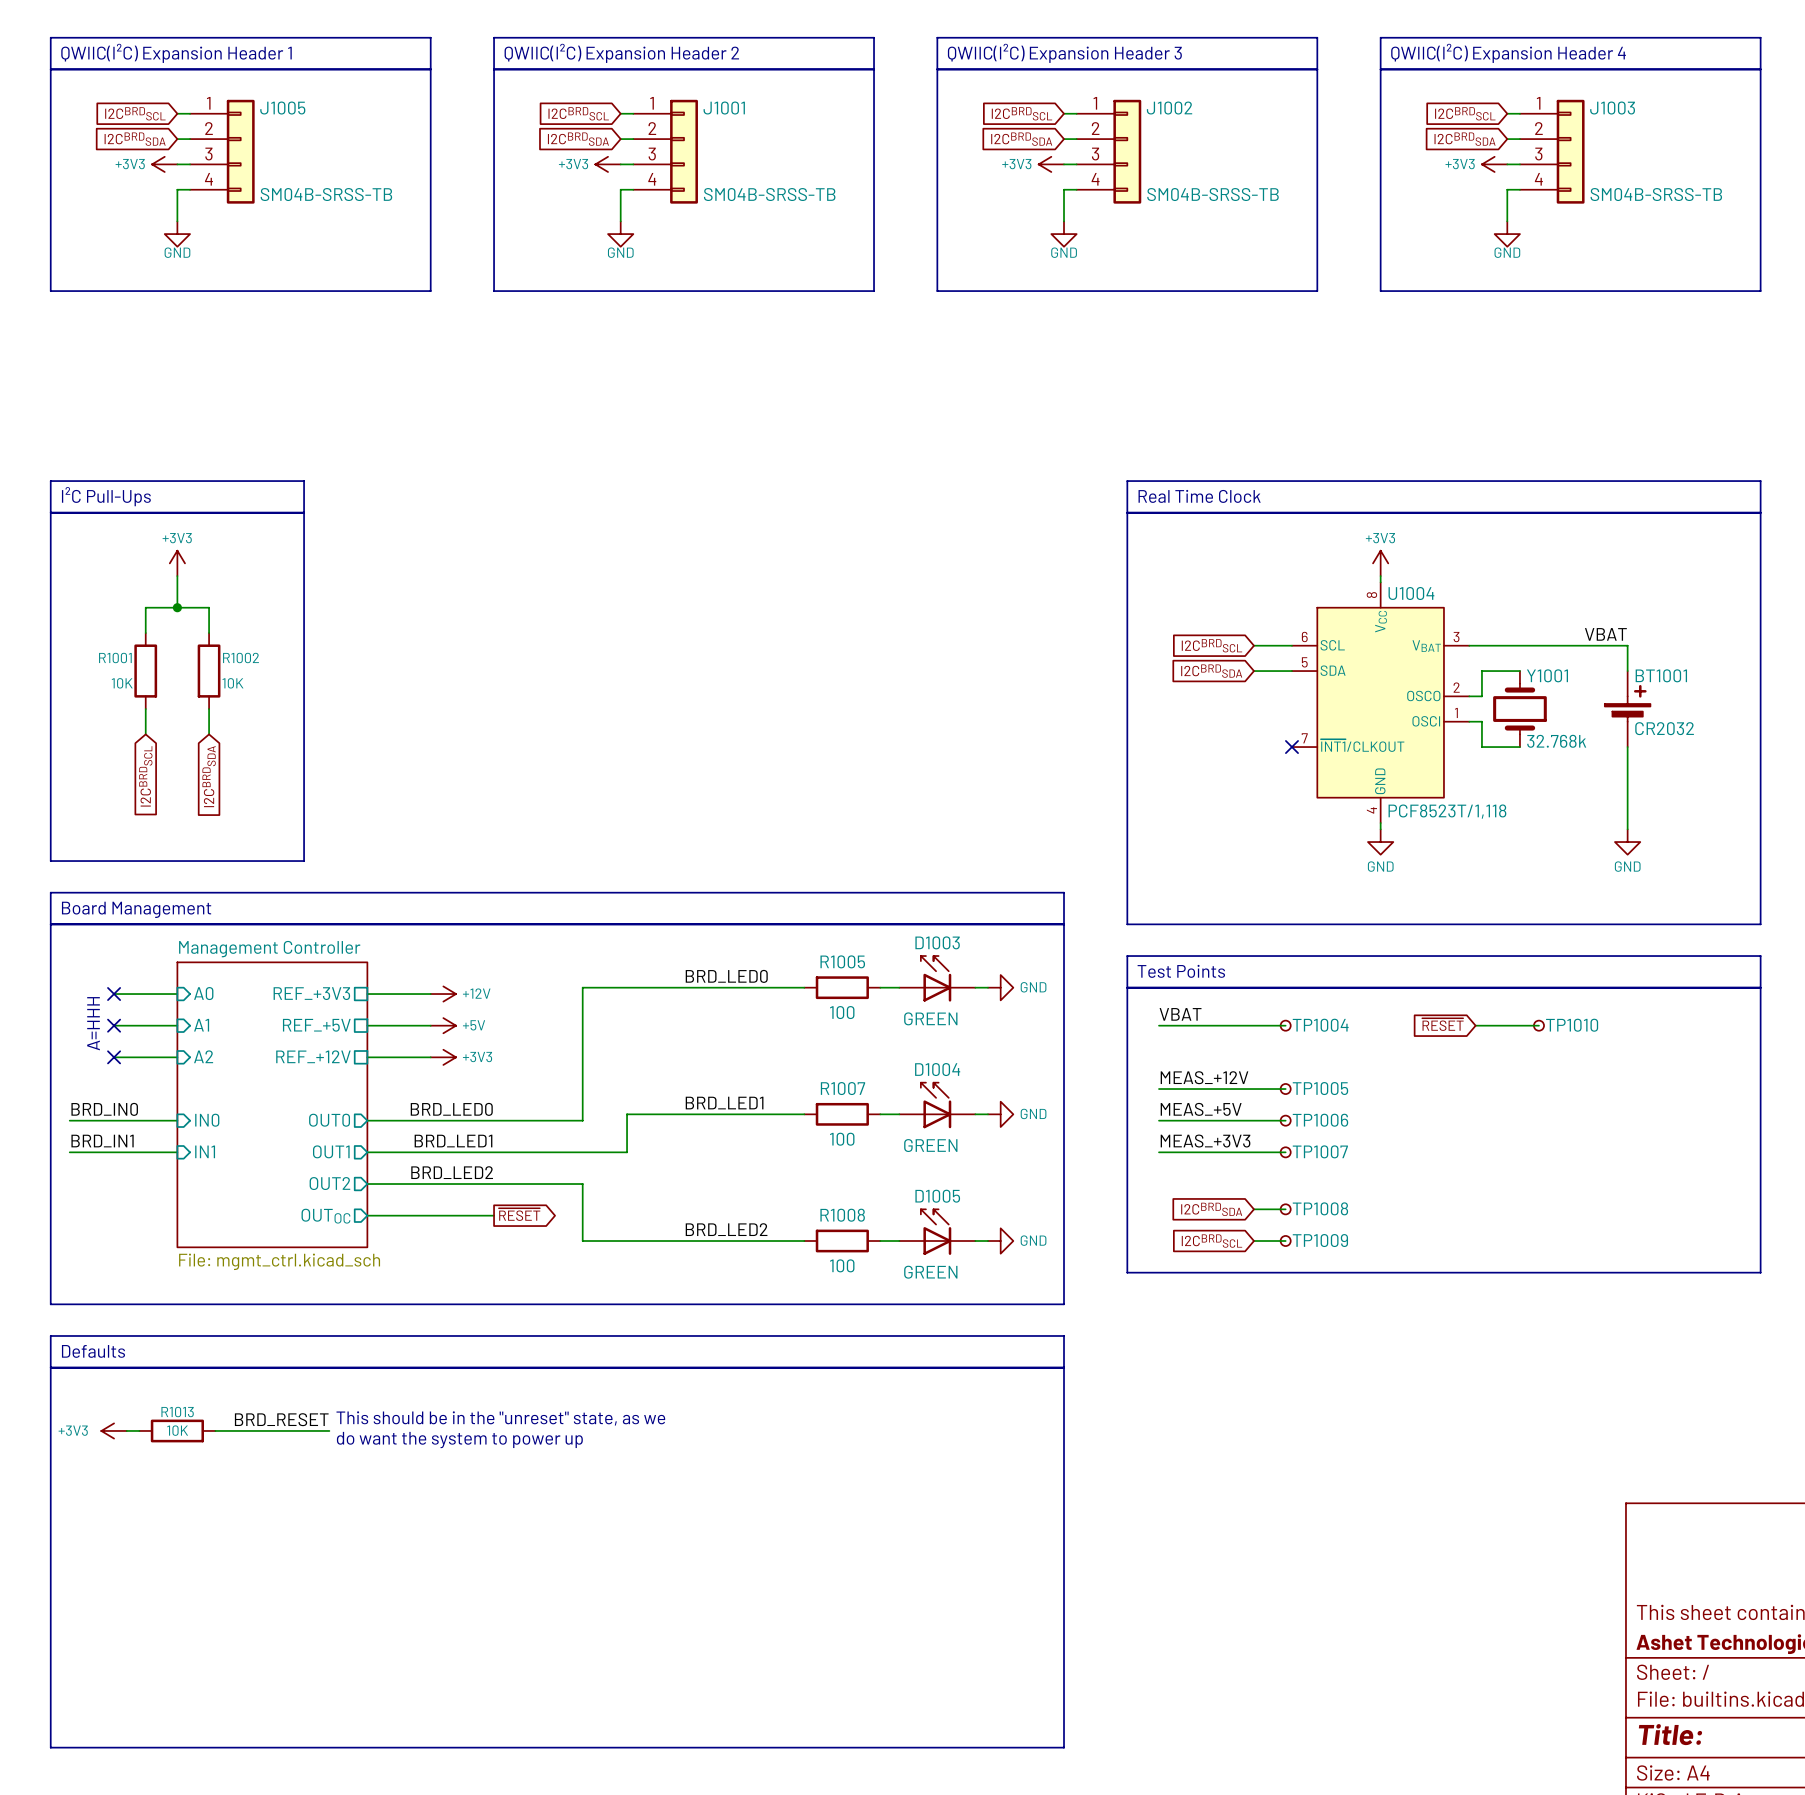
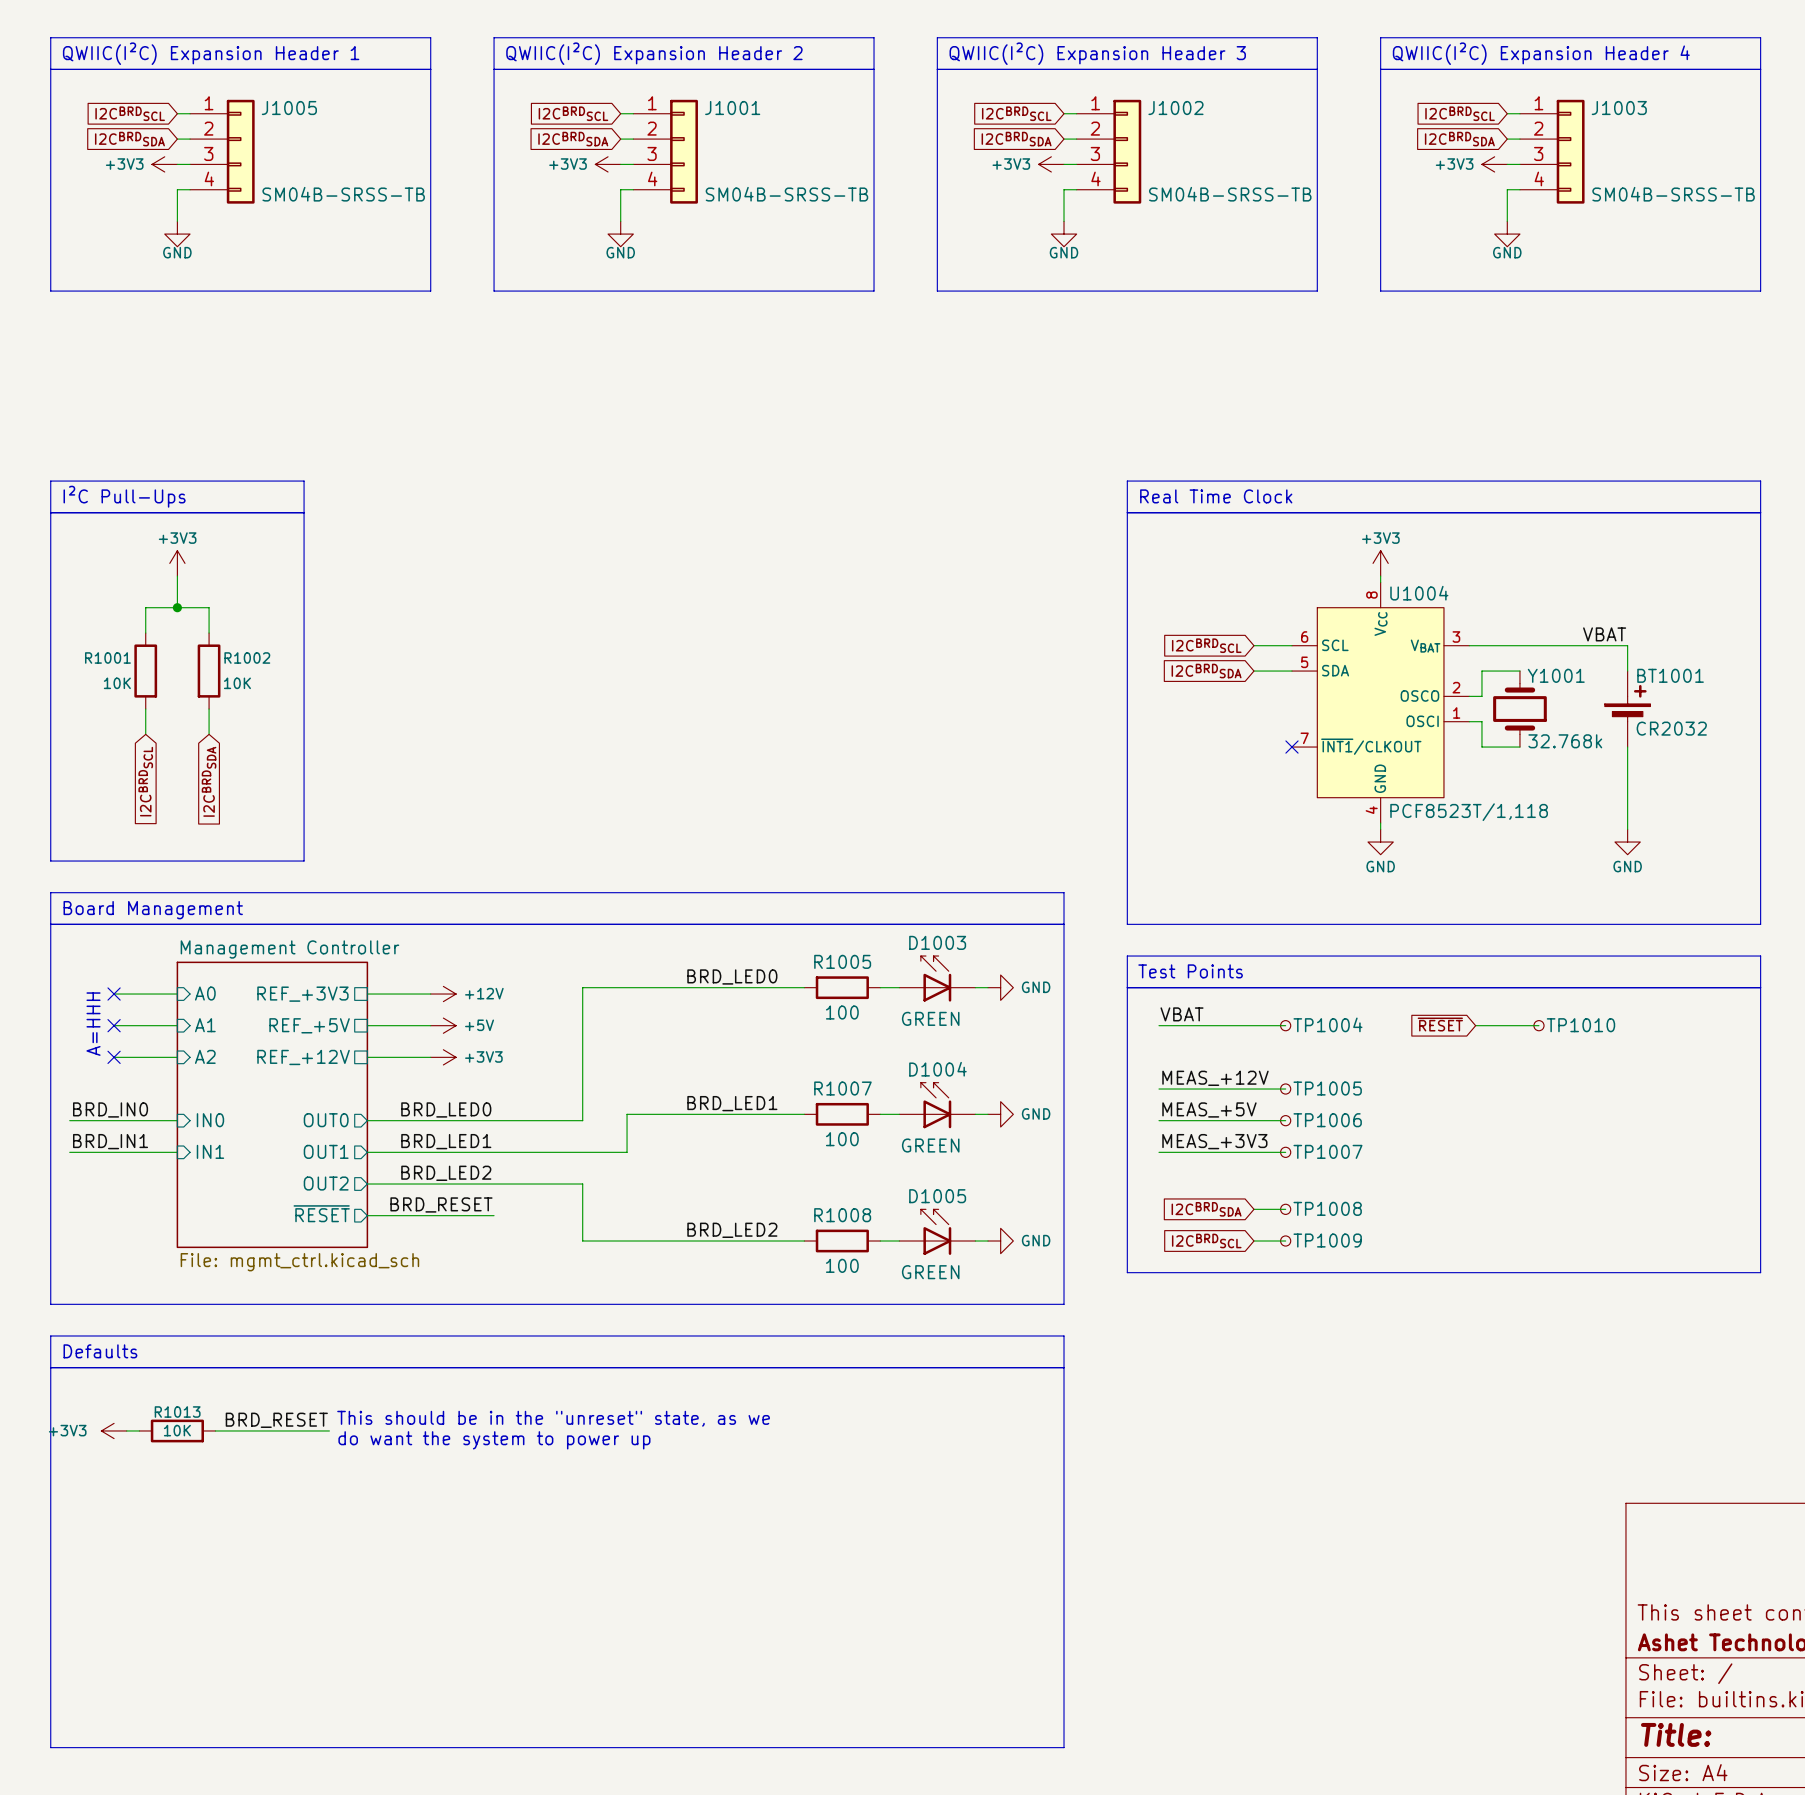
label: none -> BRD_RESET (441, 1204)
global label: ~{RESET} (519, 1214) -> none
sheet pin: OUTOC (325, 1216) -> ~{RESET} (321, 1213)

